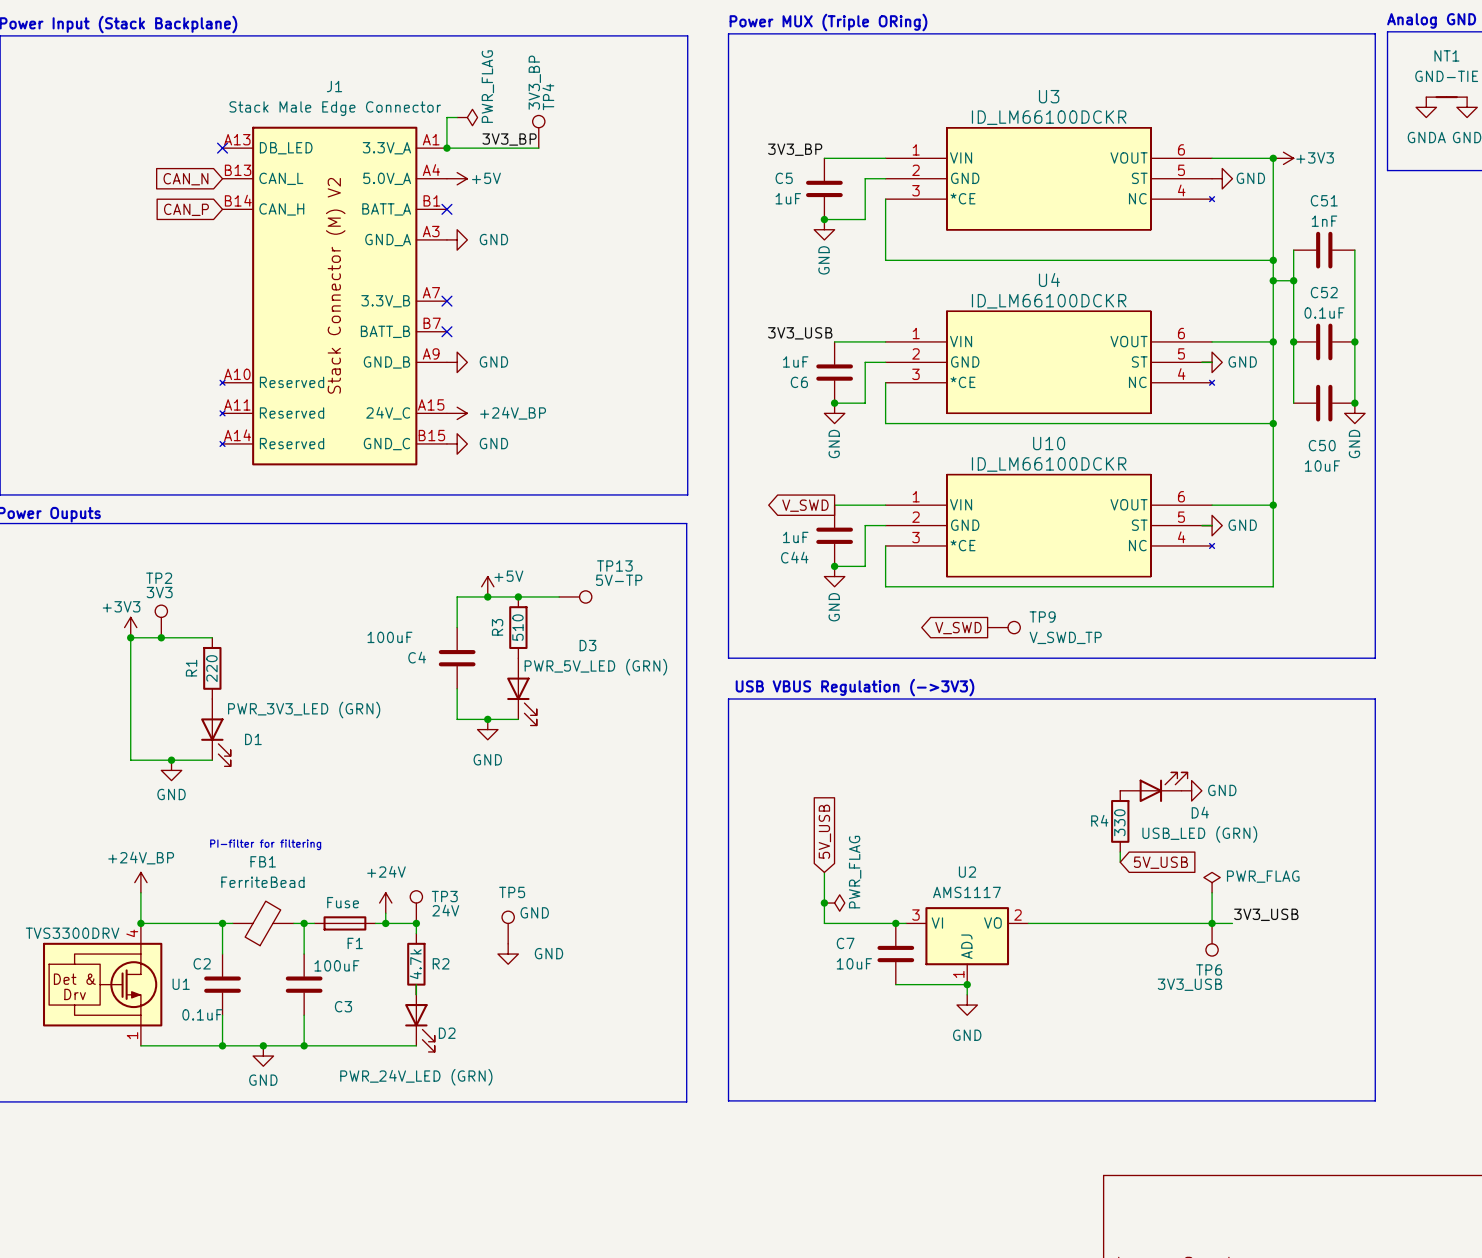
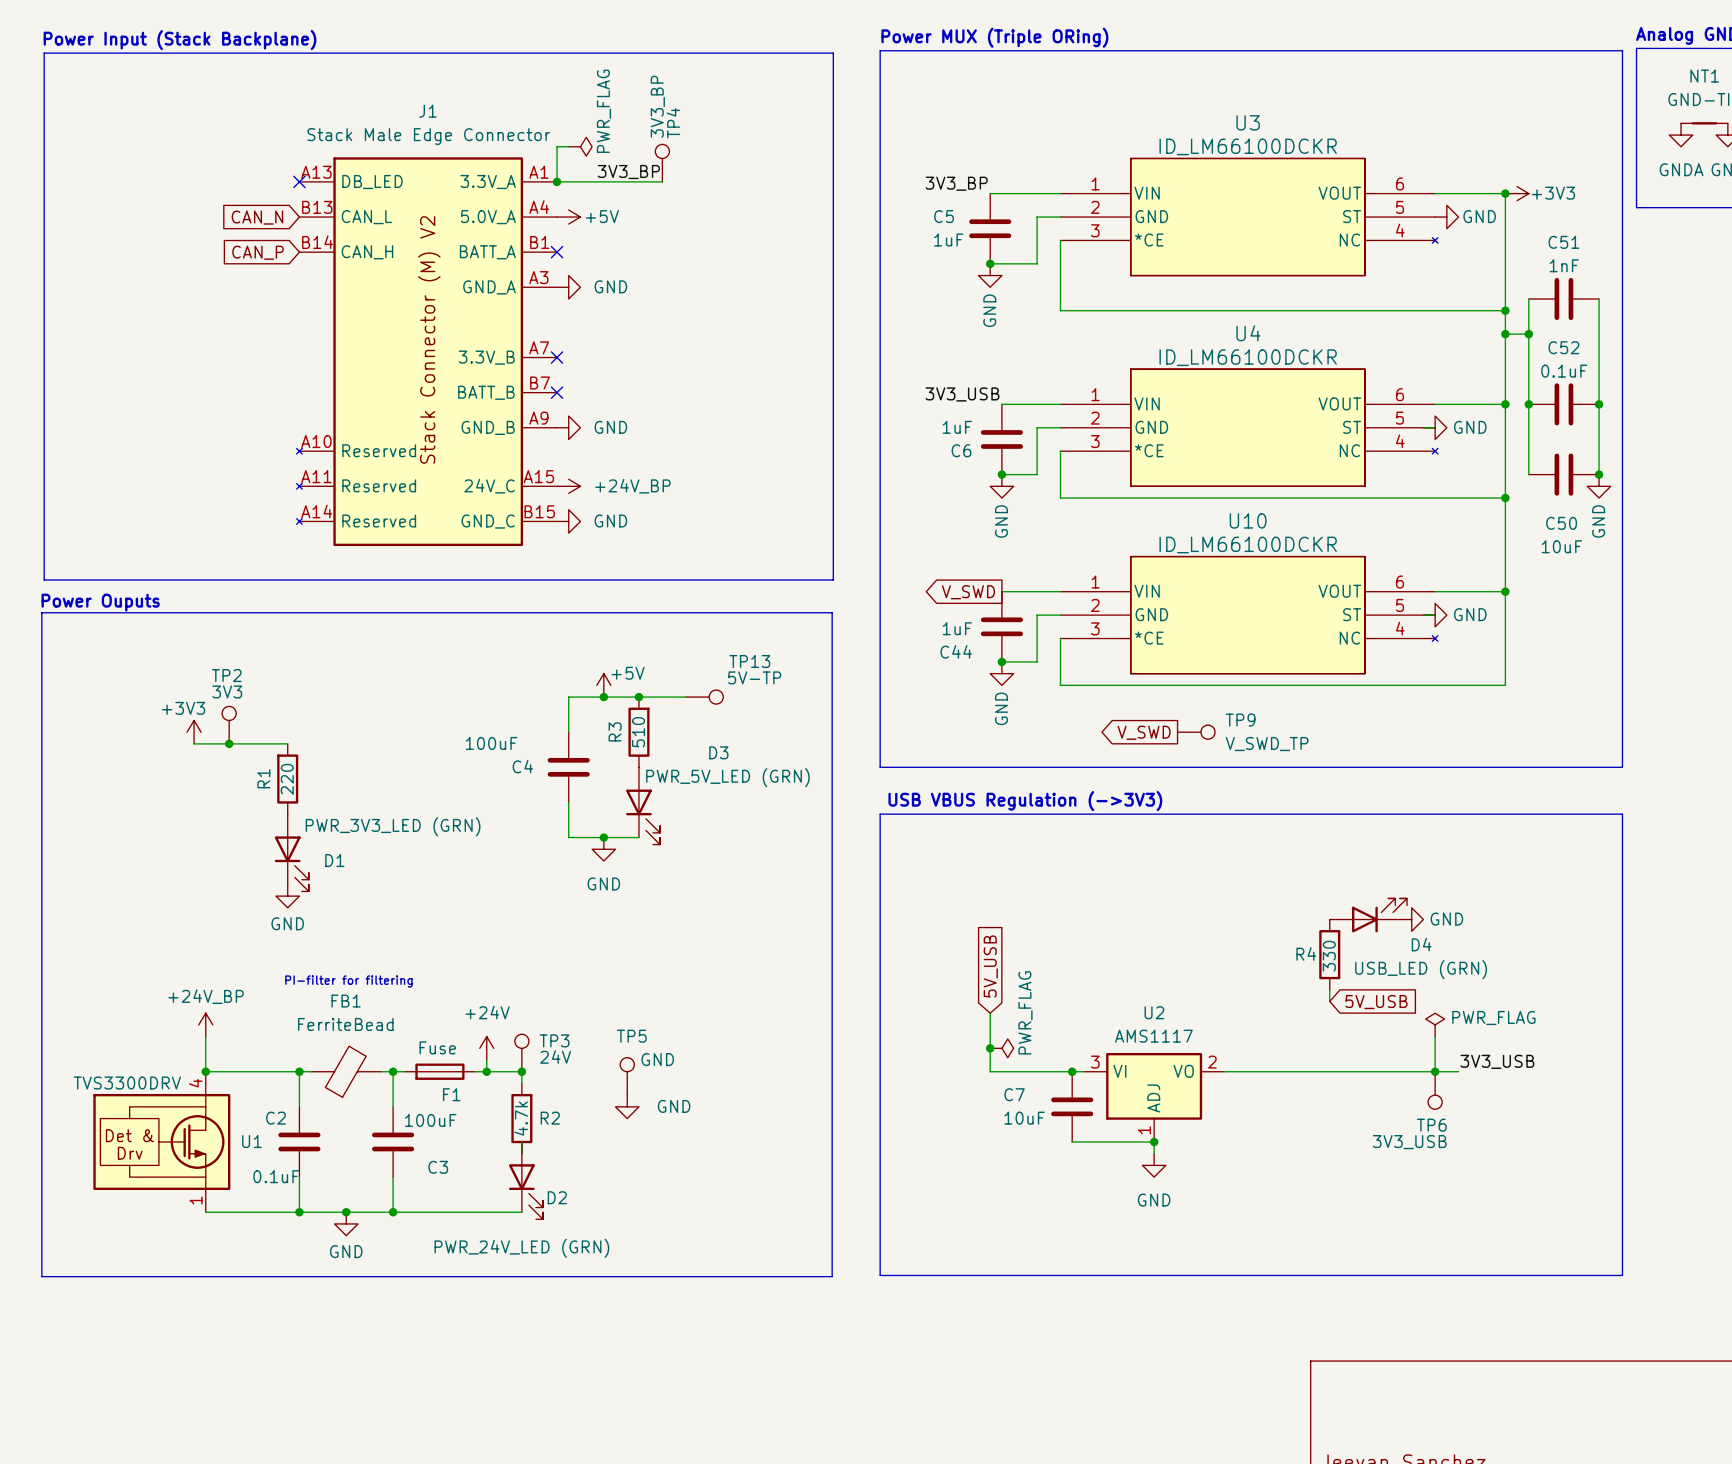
wire: (130, 637) (130, 760) (212, 760) -> none
junction: (130, 637) -> none
junction: (171, 760) -> none
power symbol position: GND (171, 770) -> GND (287, 896)

